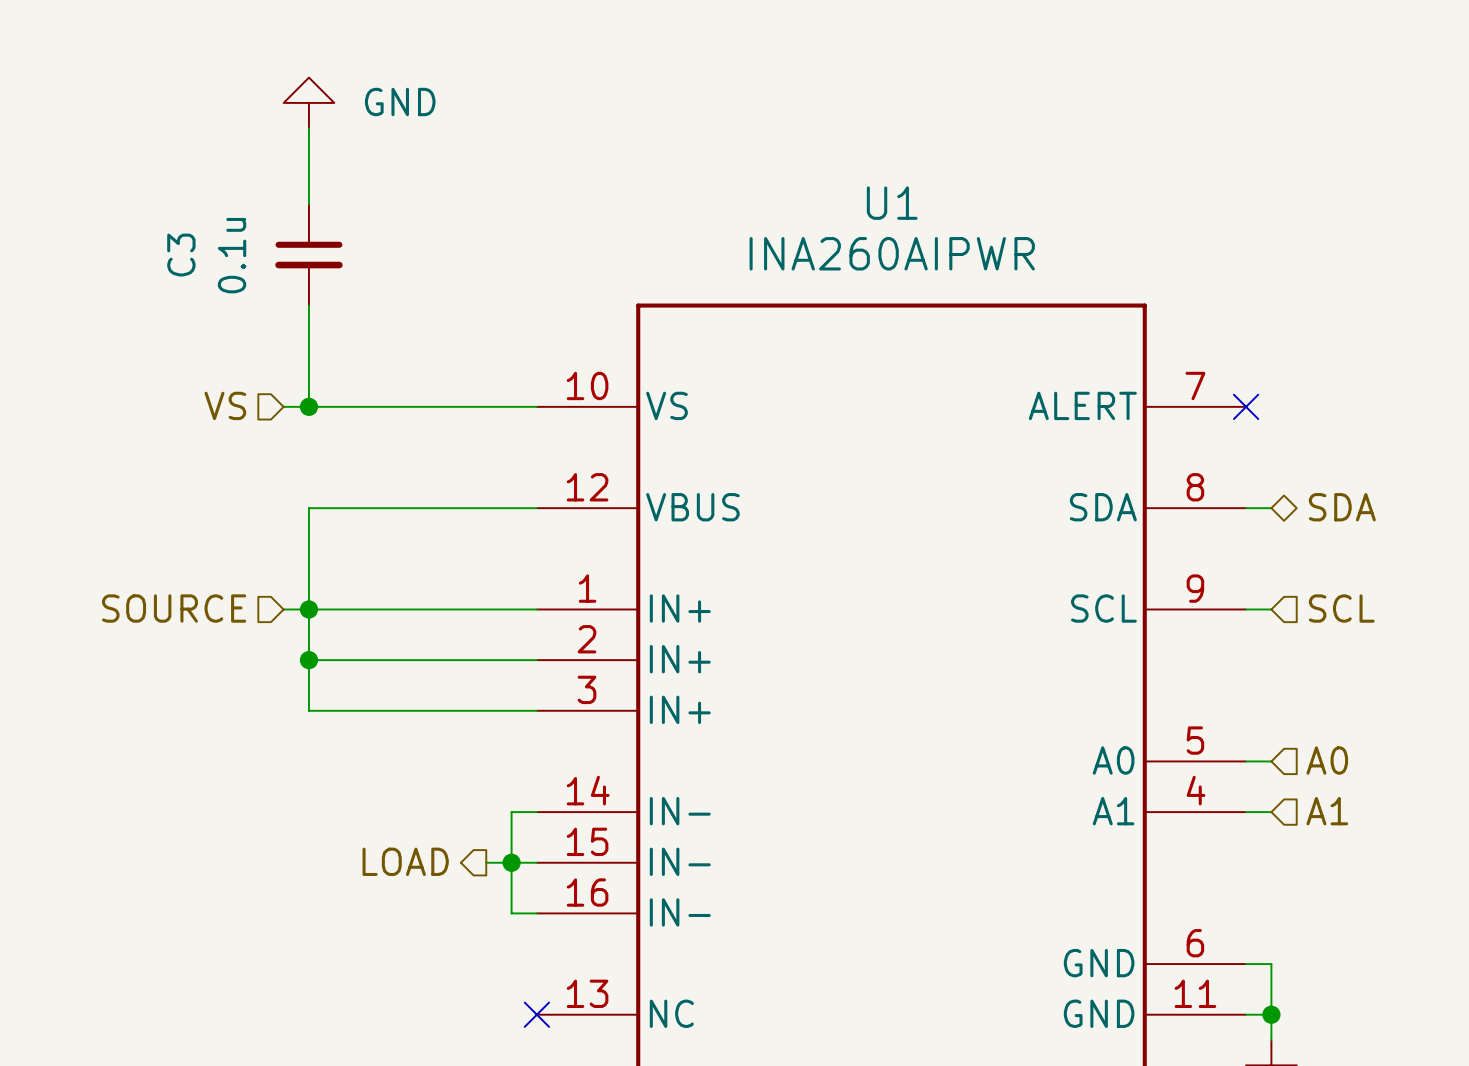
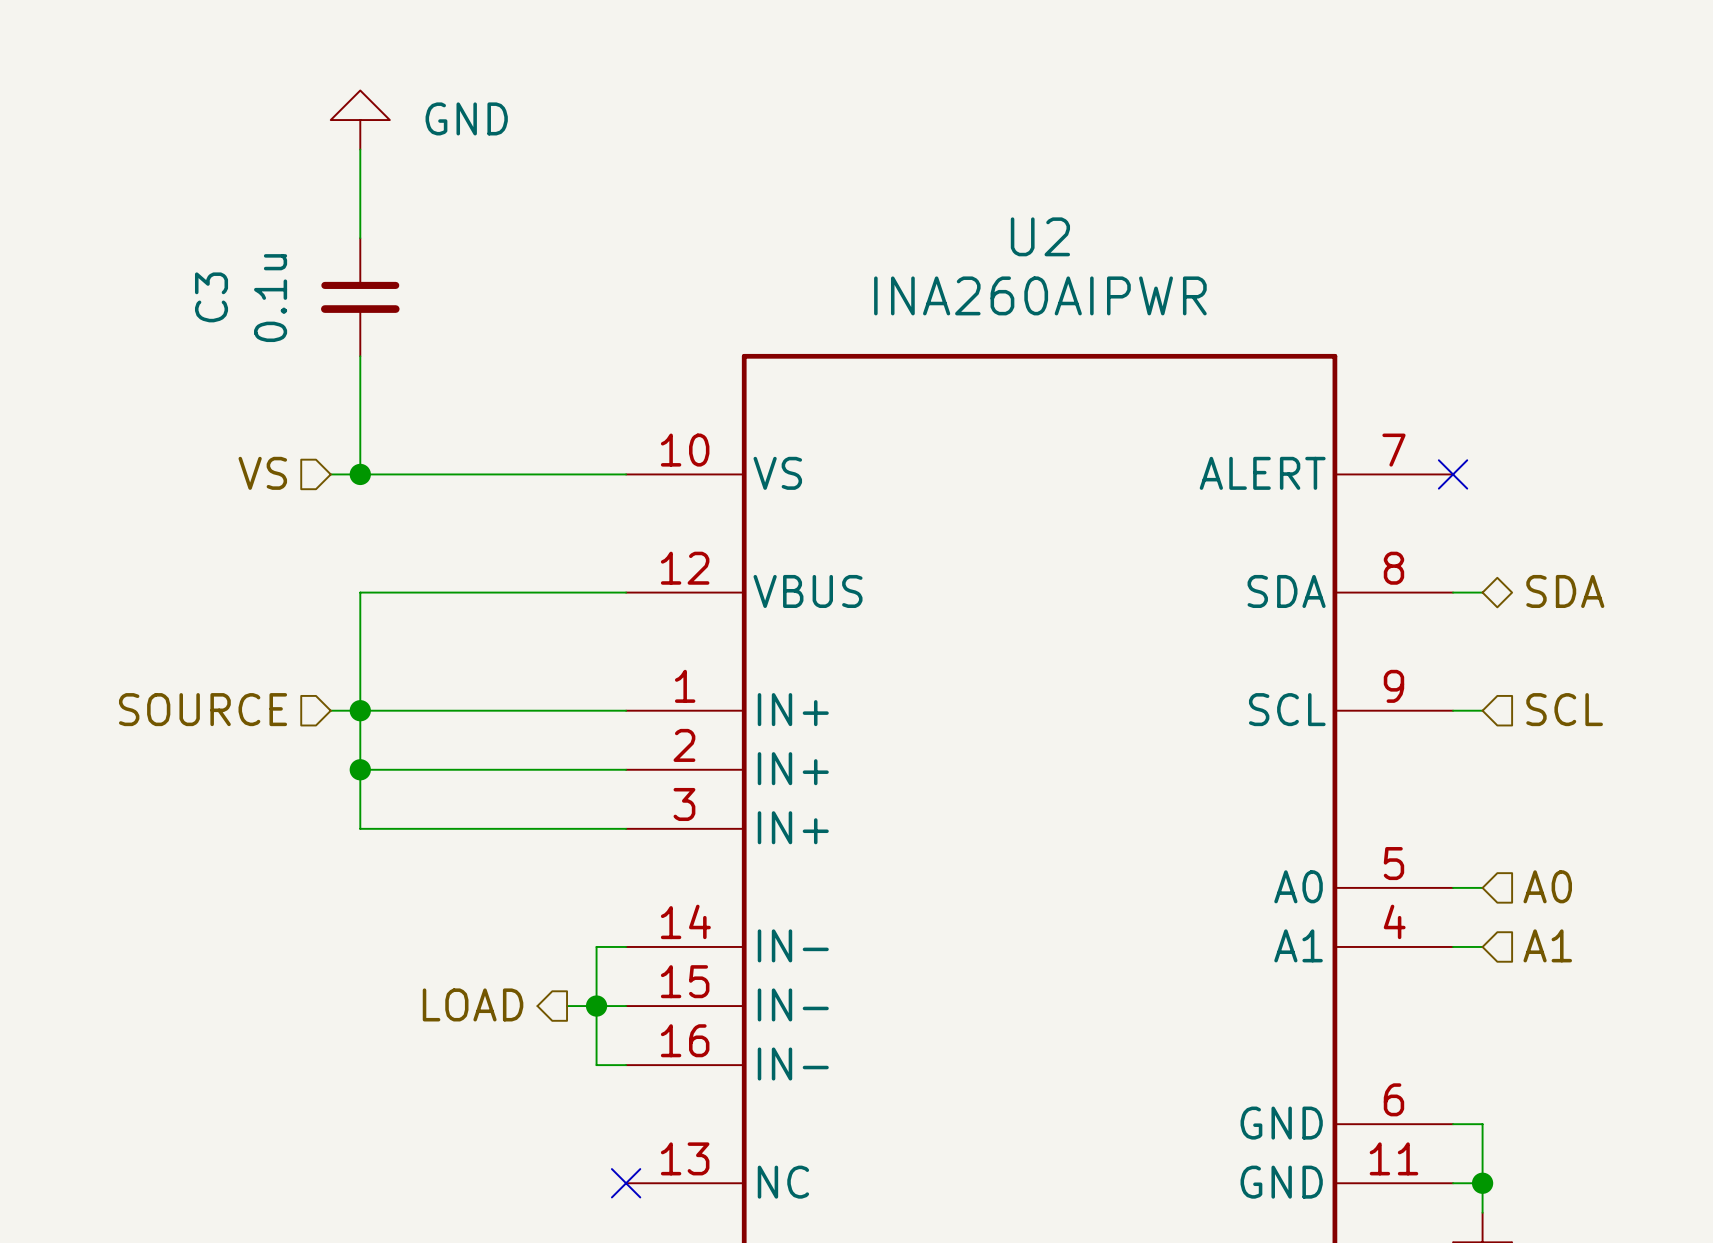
U1 name: U1 (892, 203) -> U2 (1040, 236)

